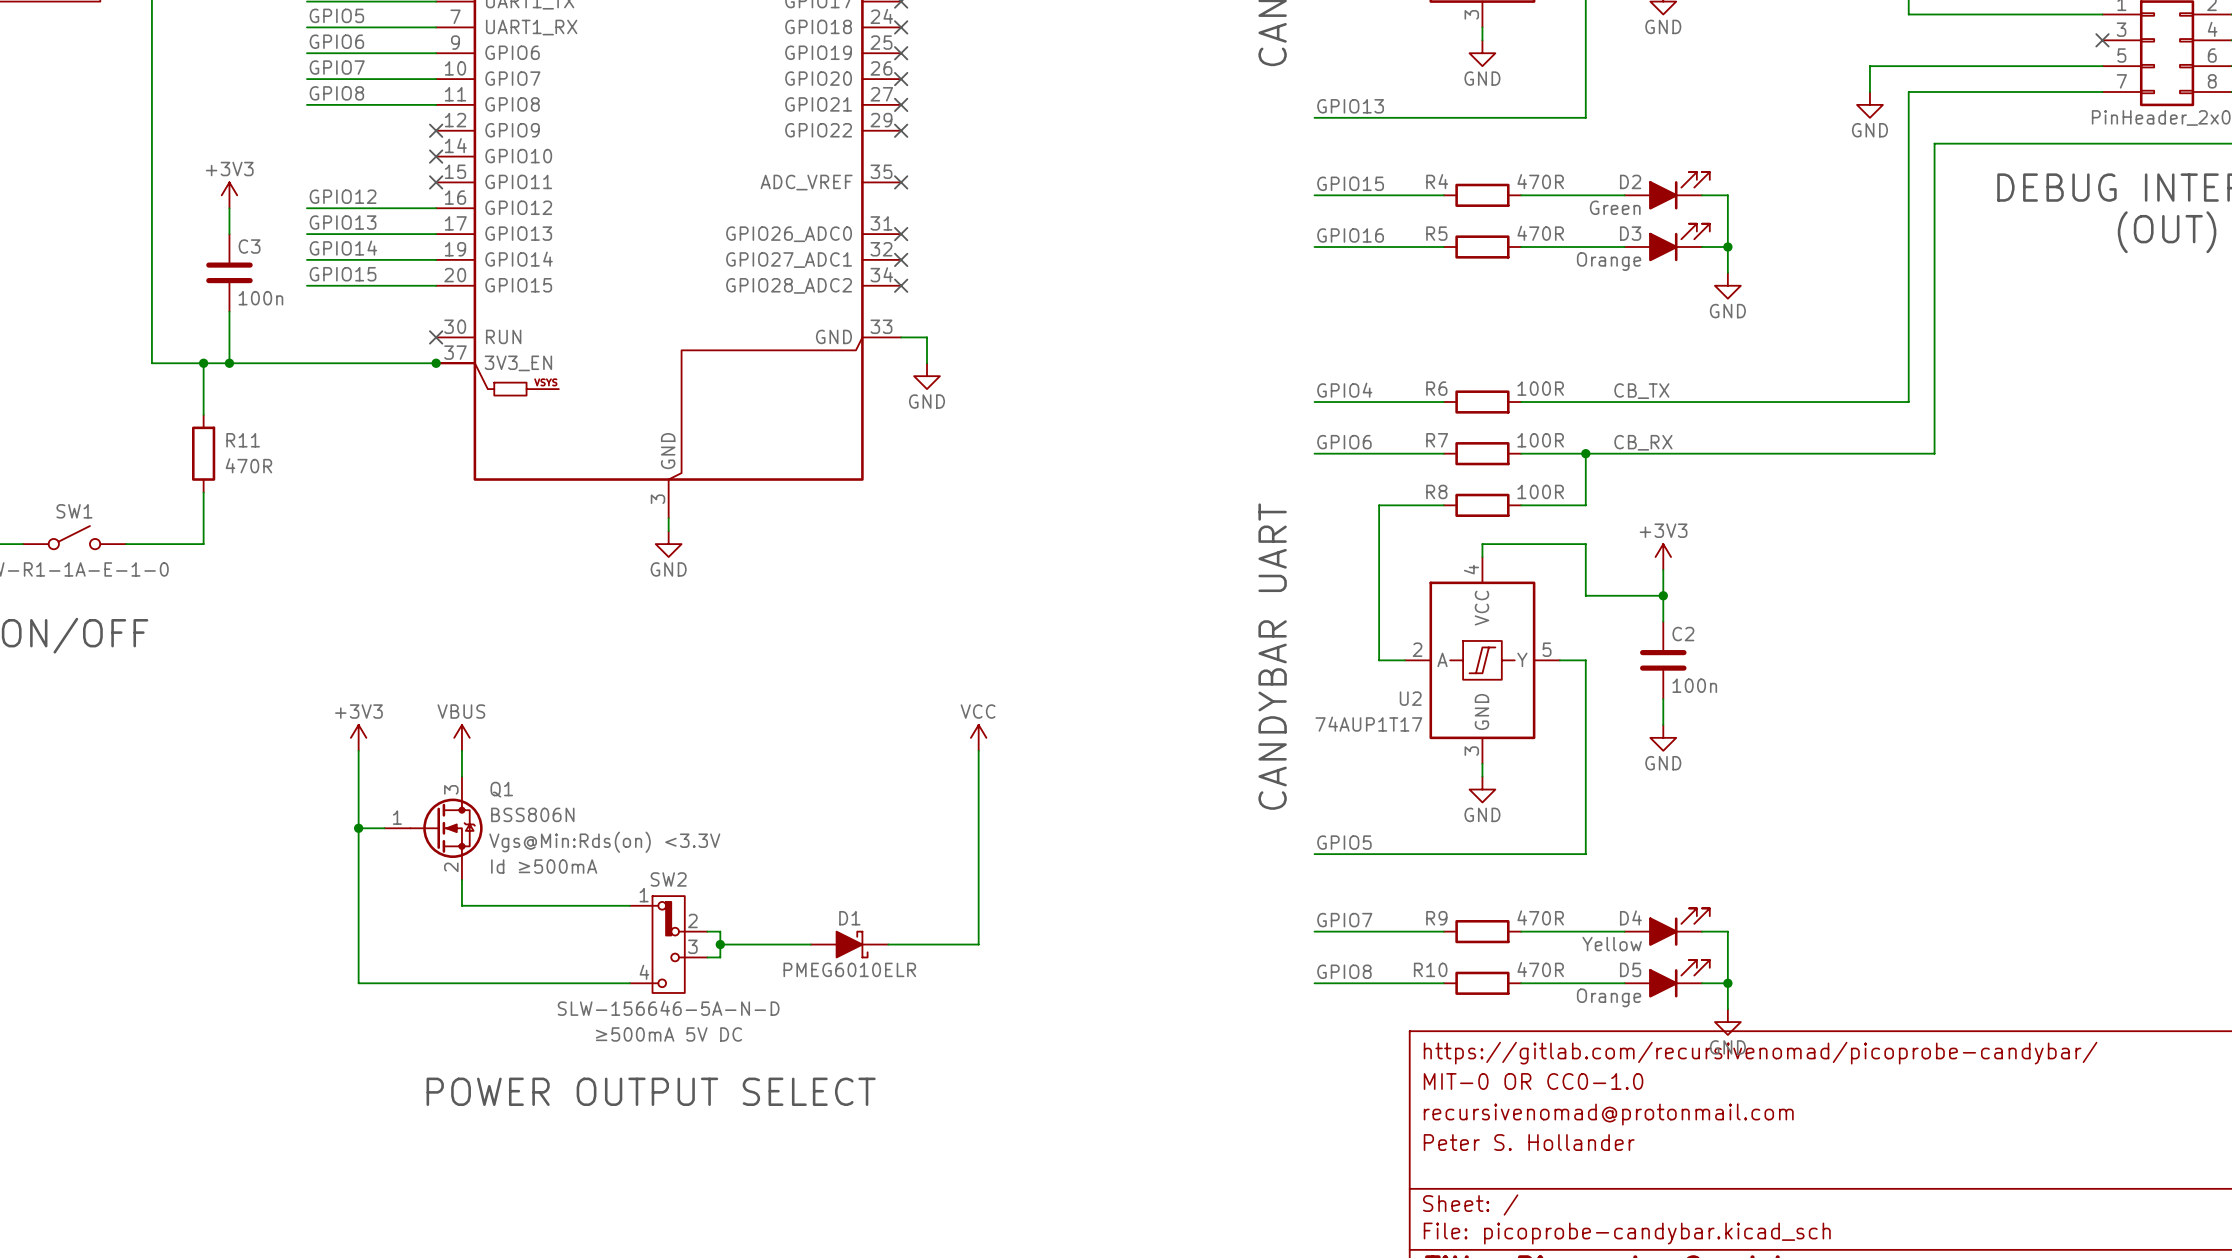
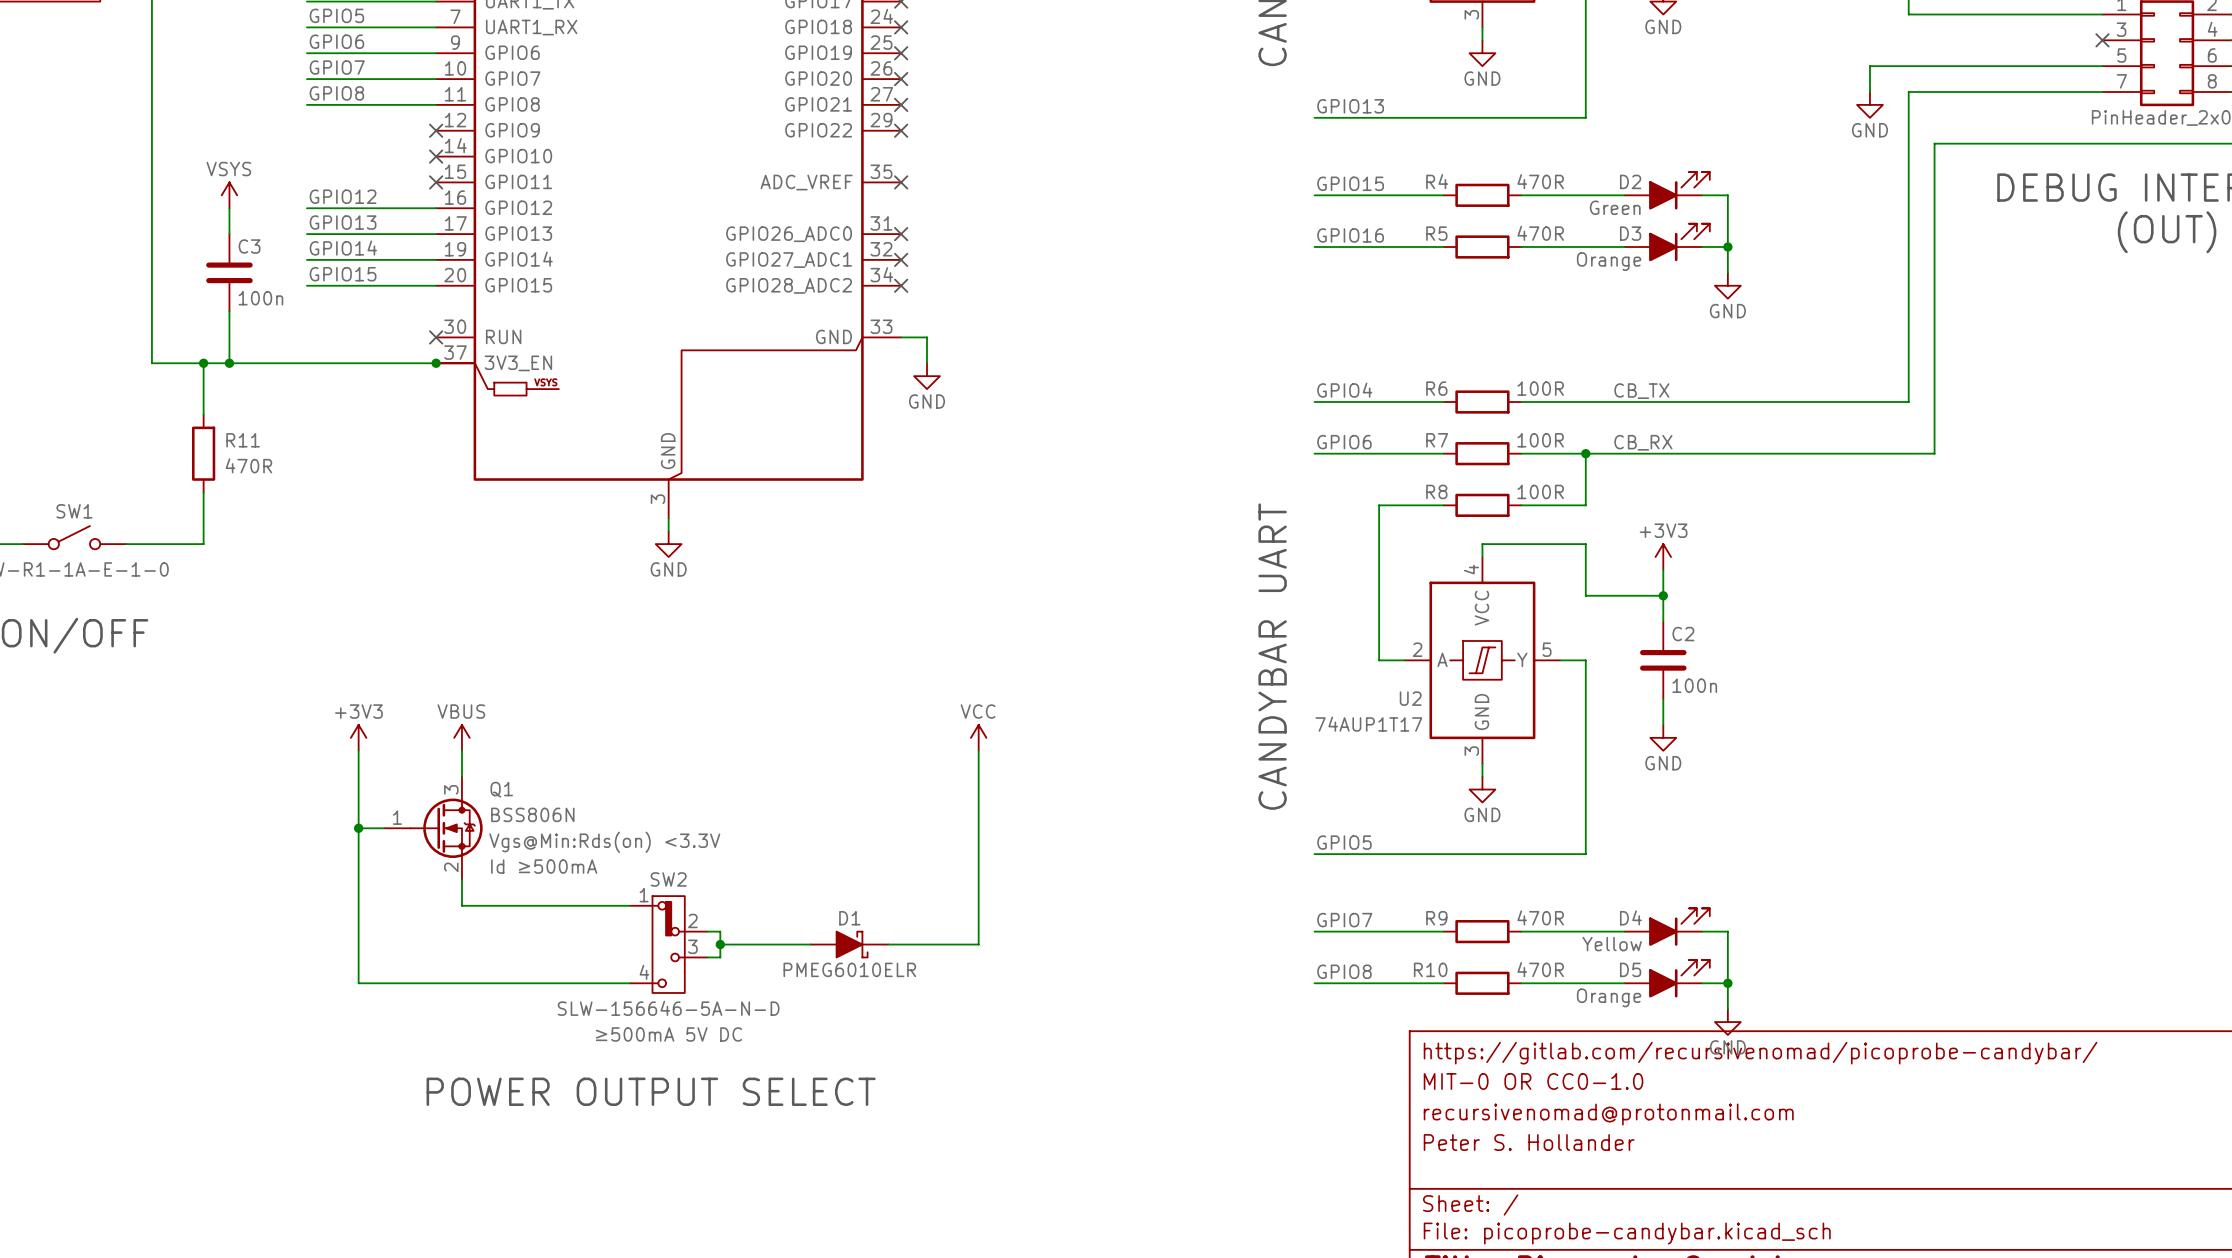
power symbol: +3V3 (229, 195) -> VSYS (229, 195)

